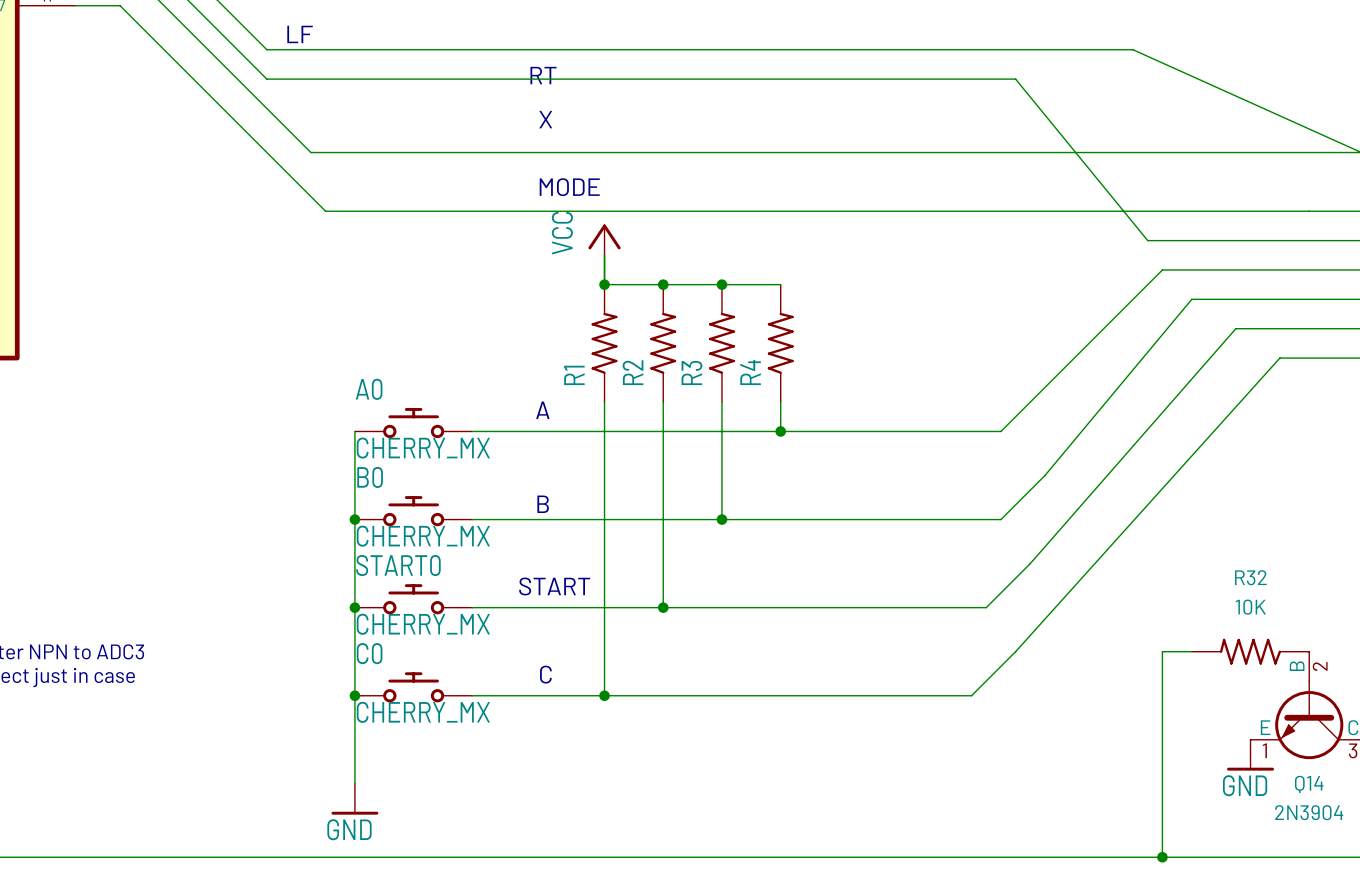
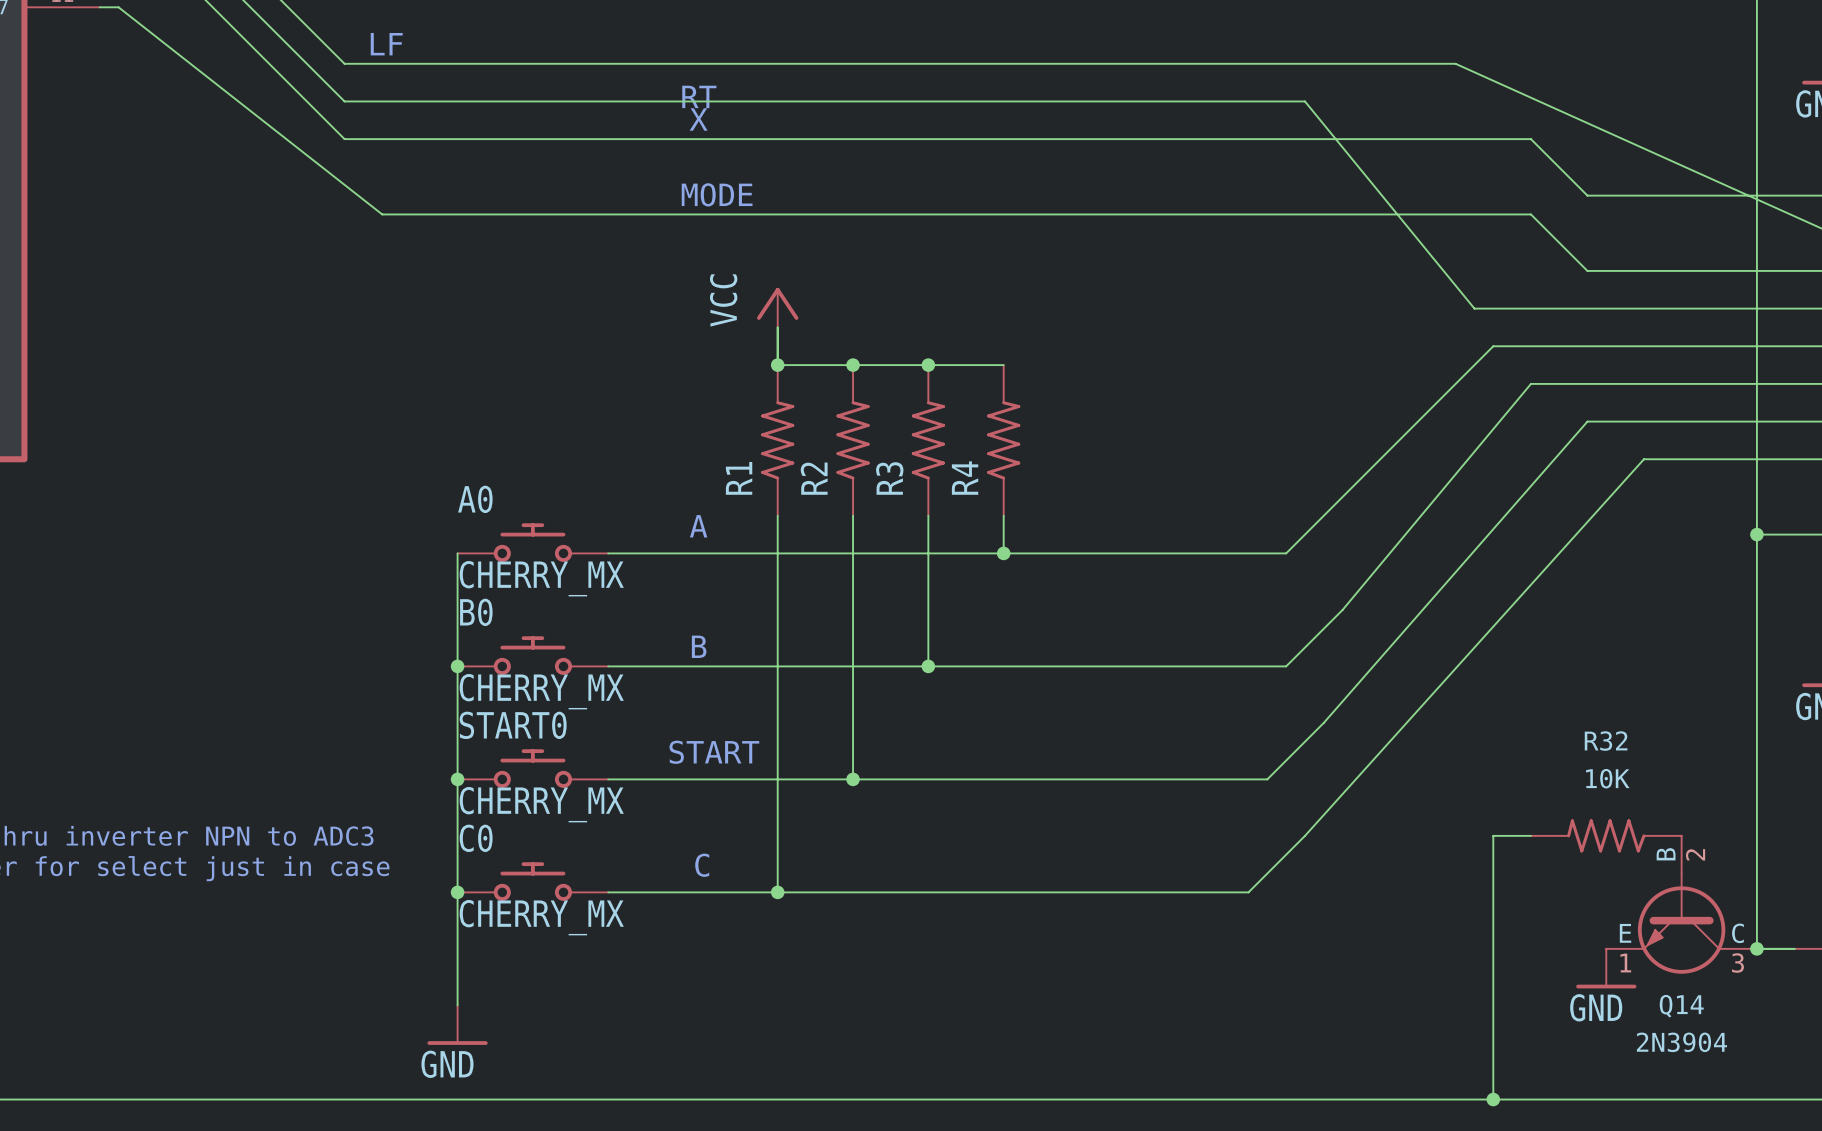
wire: (90, 5) (120, 5) (325, 211) (1235, 211) -> (118, 7) (382, 214) (1530, 214) (1587, 270)
wire: (266, 108) (310, 152) (1235, 152) -> (344, 139) (1530, 139) (1587, 195)
text position: X (545, 119) -> X (698, 119)
text position: MODE (569, 187) -> MODE (717, 194)

